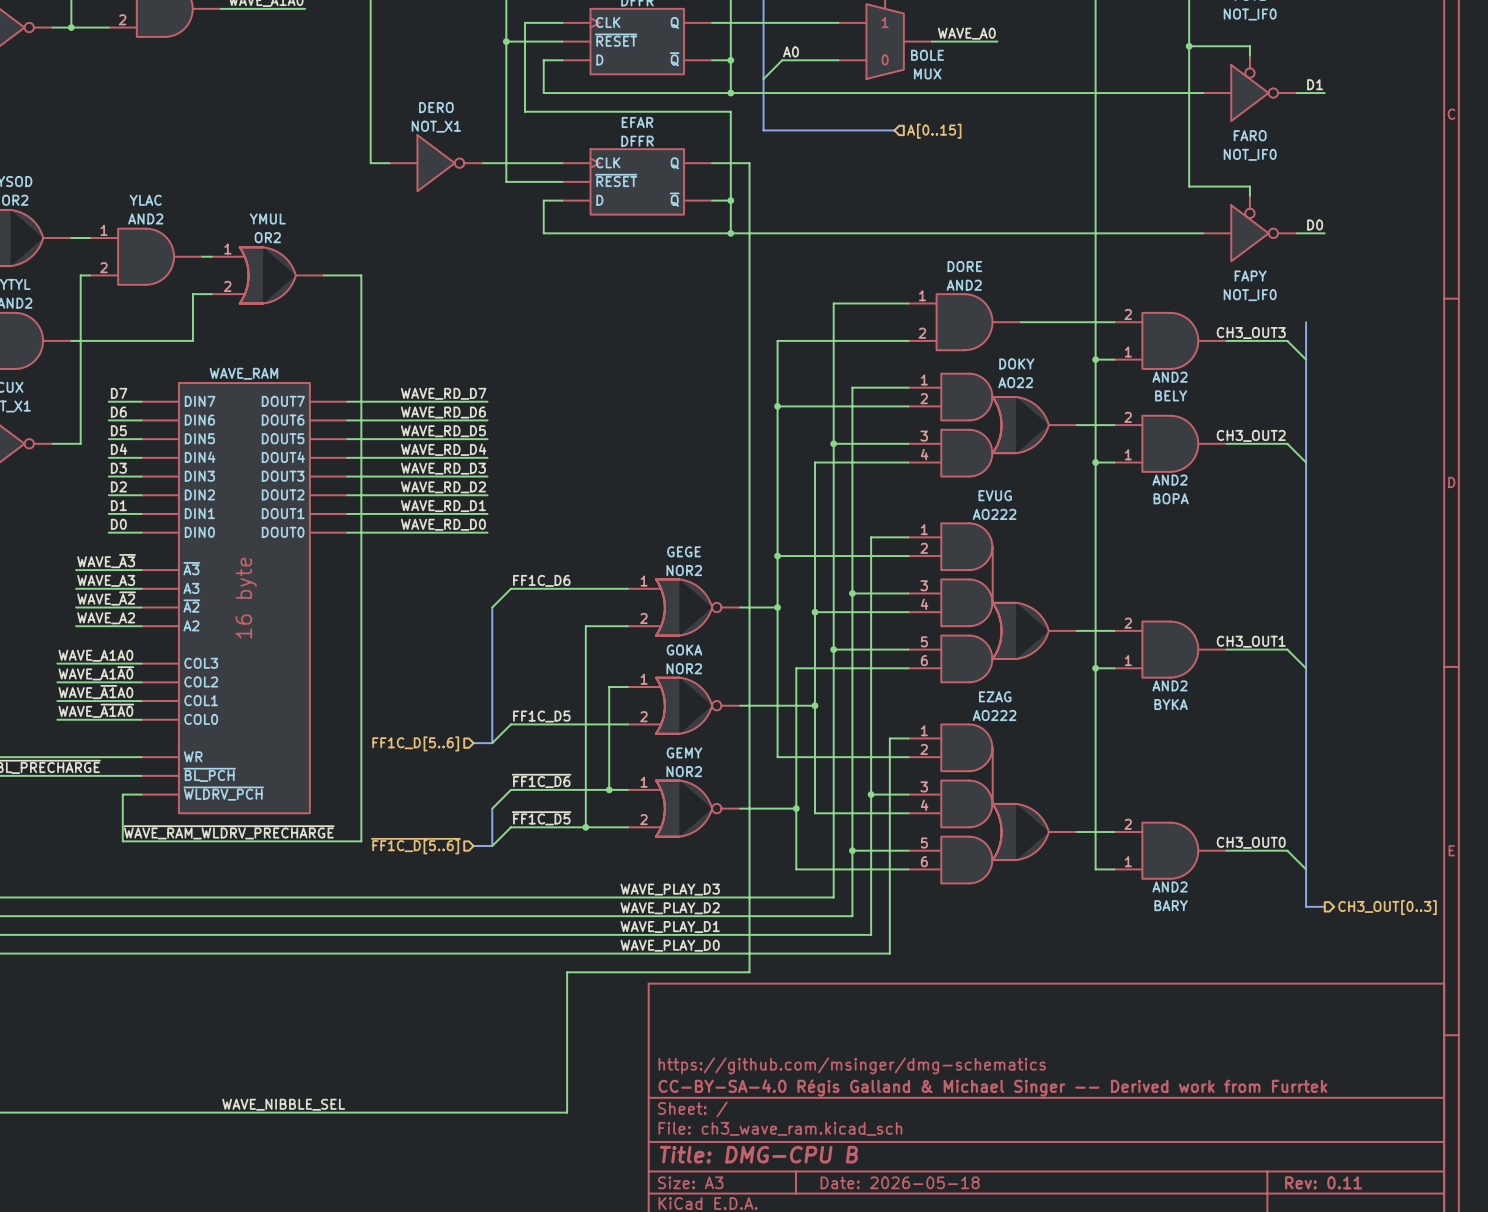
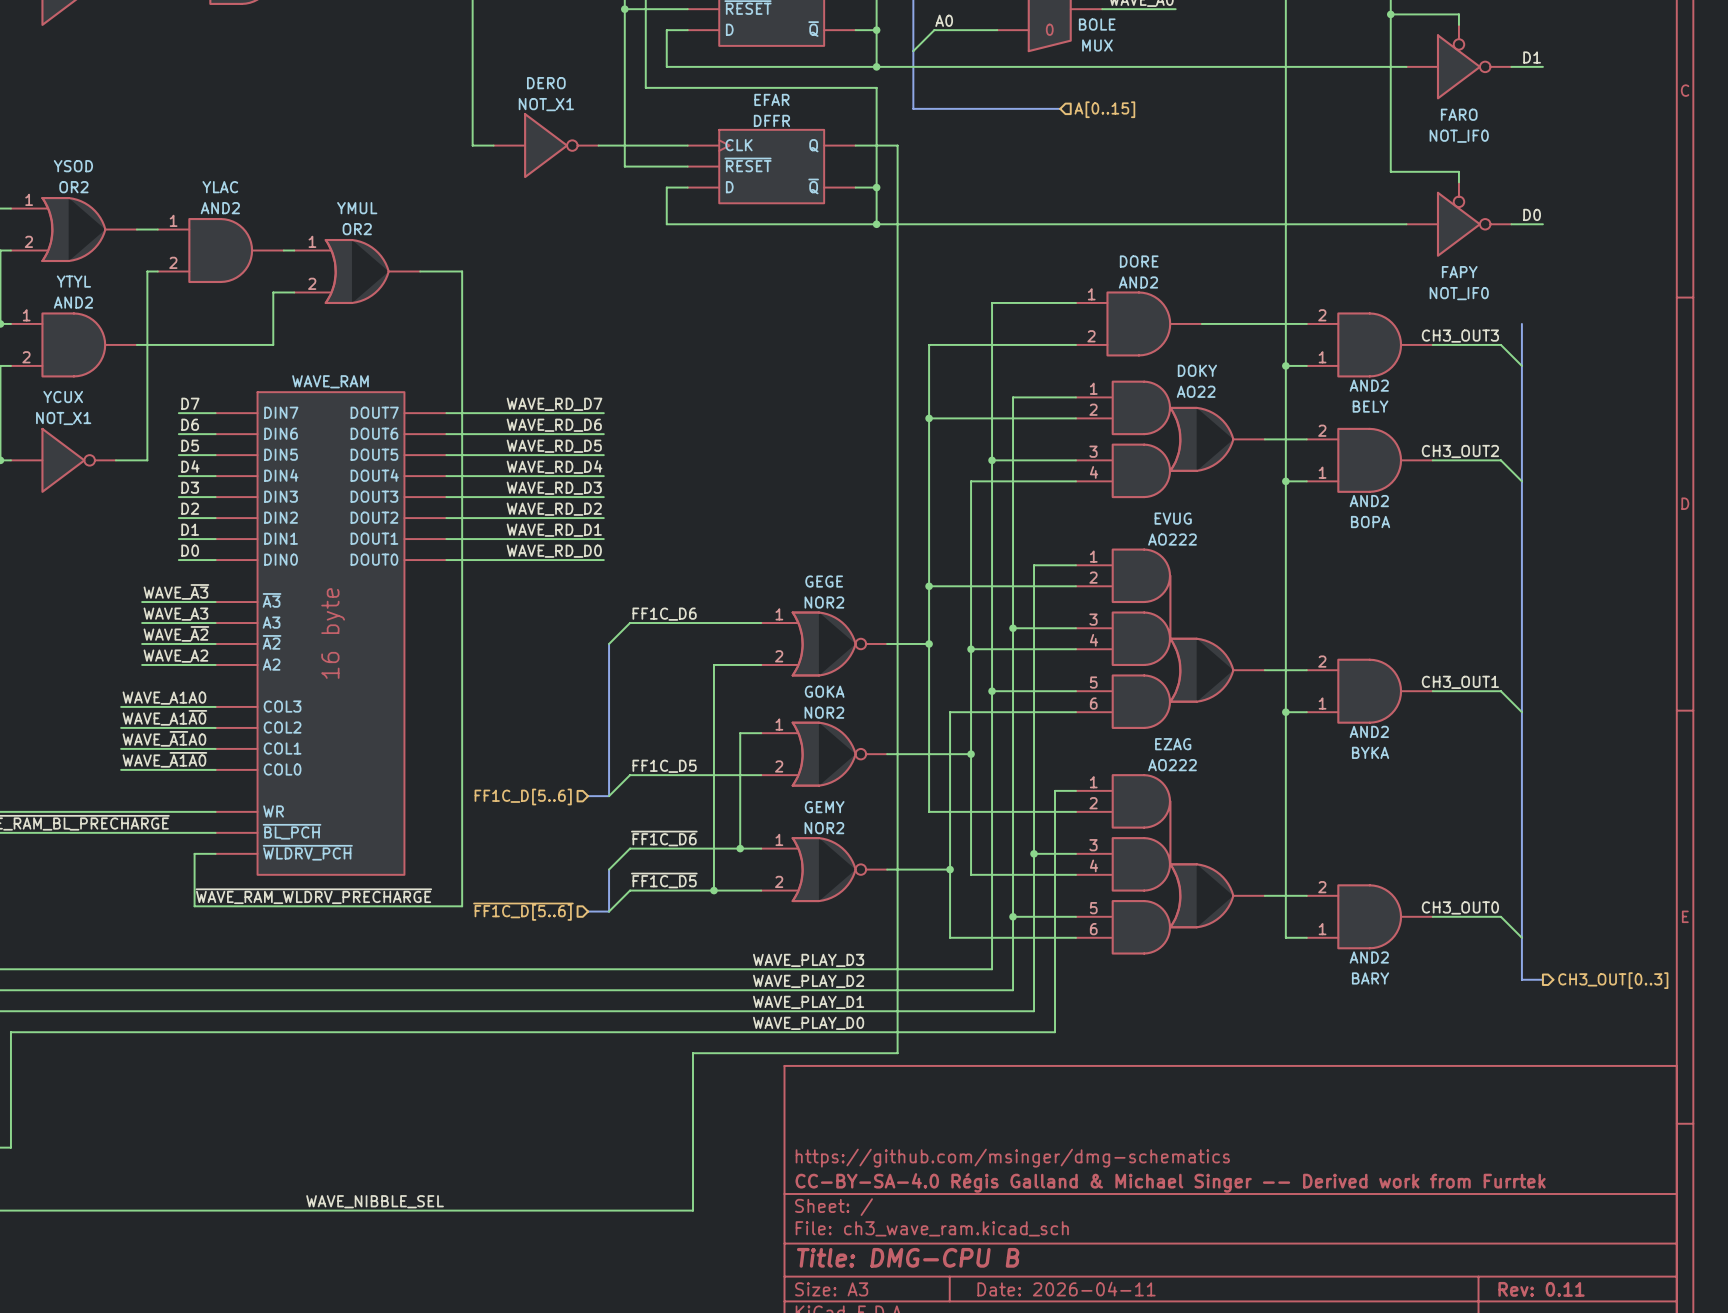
title block: Date: 2026-05-18 (900, 1182) -> Date: 2026-04-11 (1066, 1289)

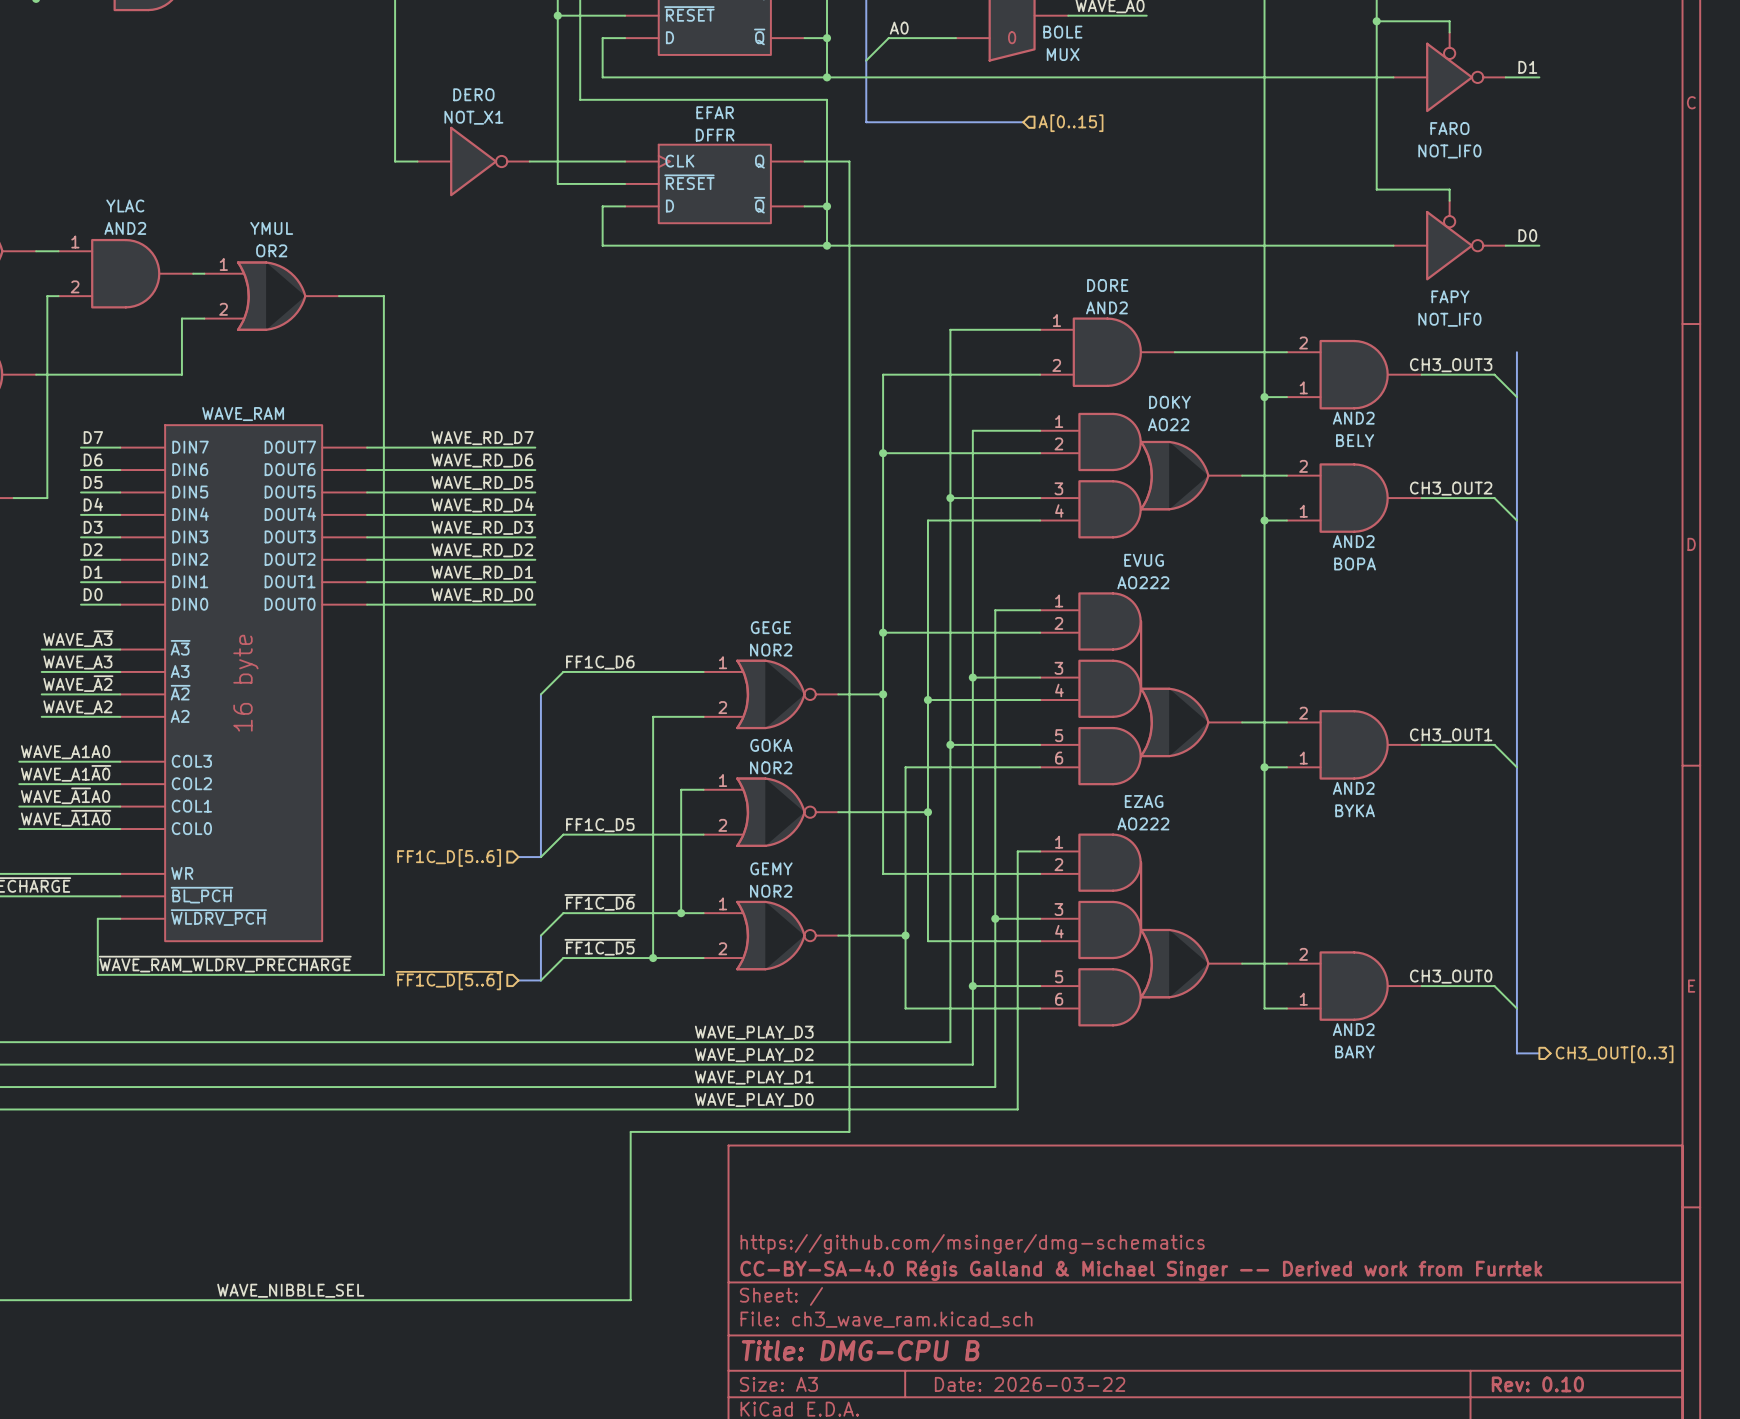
title block: Date: 2026-04-11 (1066, 1289) -> Date: 2026-03-22 (1030, 1384)
title block: Rev: 0.11 (1541, 1289) -> Rev: 0.10 (1537, 1384)

